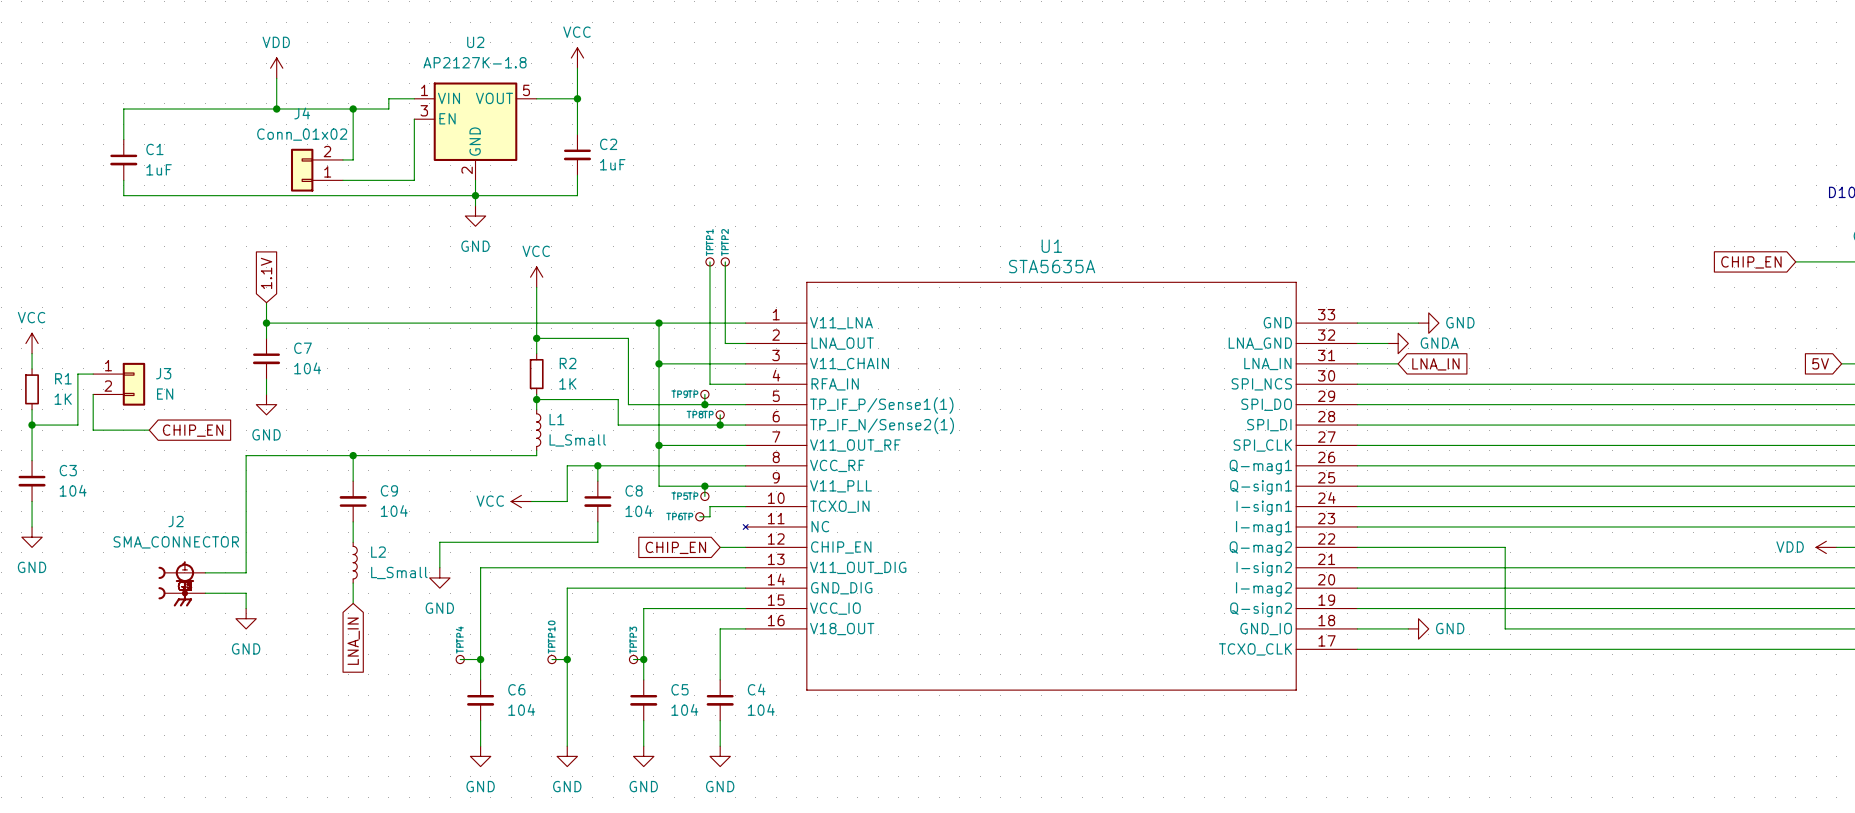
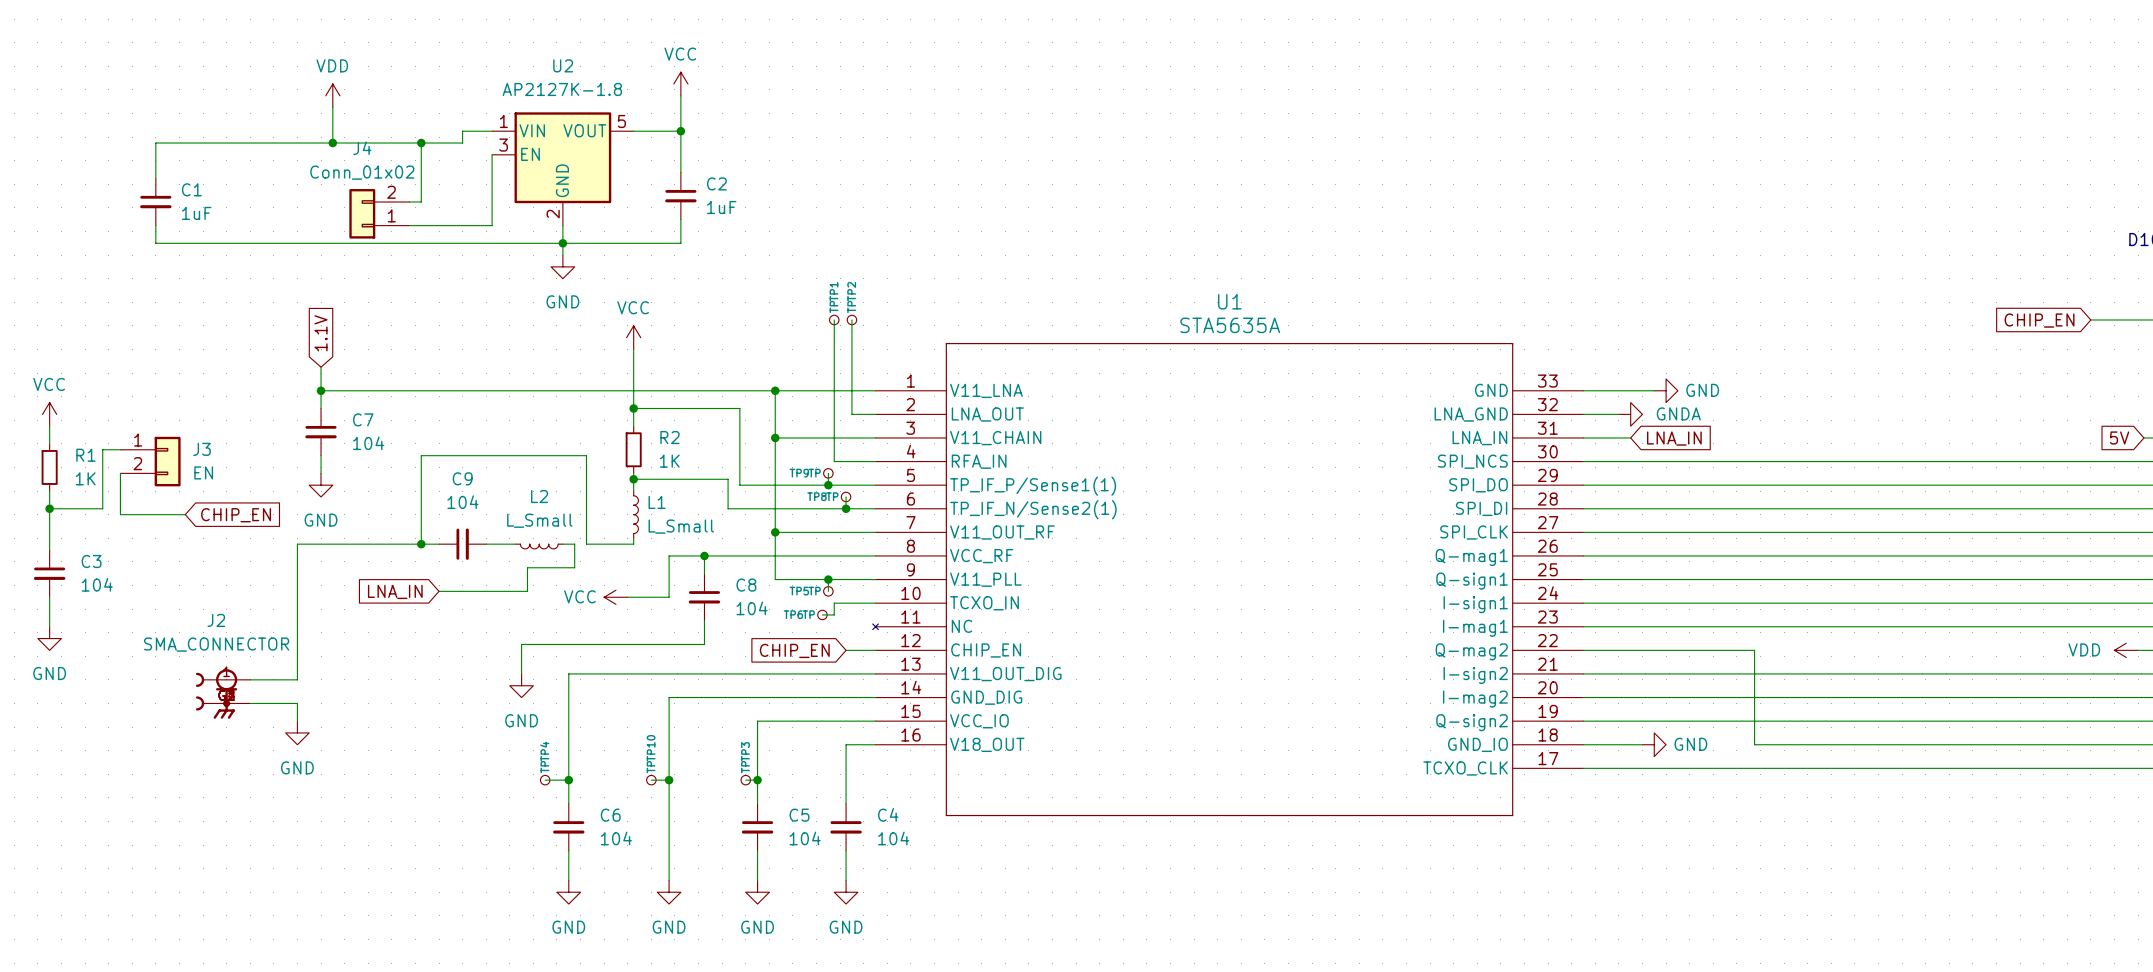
wire: (353, 455) (353, 481) -> none
wire: (434, 455) (475, 455) -> none
wire: (485, 455) (495, 455) -> (421, 544) (421, 455) (586, 455) (586, 544)
wire: none -> (574, 544) (574, 567) (527, 567) (527, 591) (439, 591)
C9 name position: C9 (389, 490) -> C9 (462, 478)
C9 rotation: 0° (353, 501) -> 90° clockwise (462, 544)
C9 position: (353, 501) -> (462, 544)
C9 value position: 104 (394, 511) -> 104 (462, 502)
wire: (353, 521) (353, 542) -> none
L2 name position: L2 (378, 552) -> L2 (539, 496)
L2 rotation: 0° (355, 562) -> 90° clockwise (539, 546)
L2 position: (355, 562) -> (539, 546)
L2 value position: L_Small (399, 572) -> L_Small (539, 520)
wire: (353, 583) (353, 603) -> none
global label rotation: 0° (353, 641) -> 90° clockwise (395, 591)
global label position: LNA_IN (353, 641) -> LNA_IN (395, 591)

